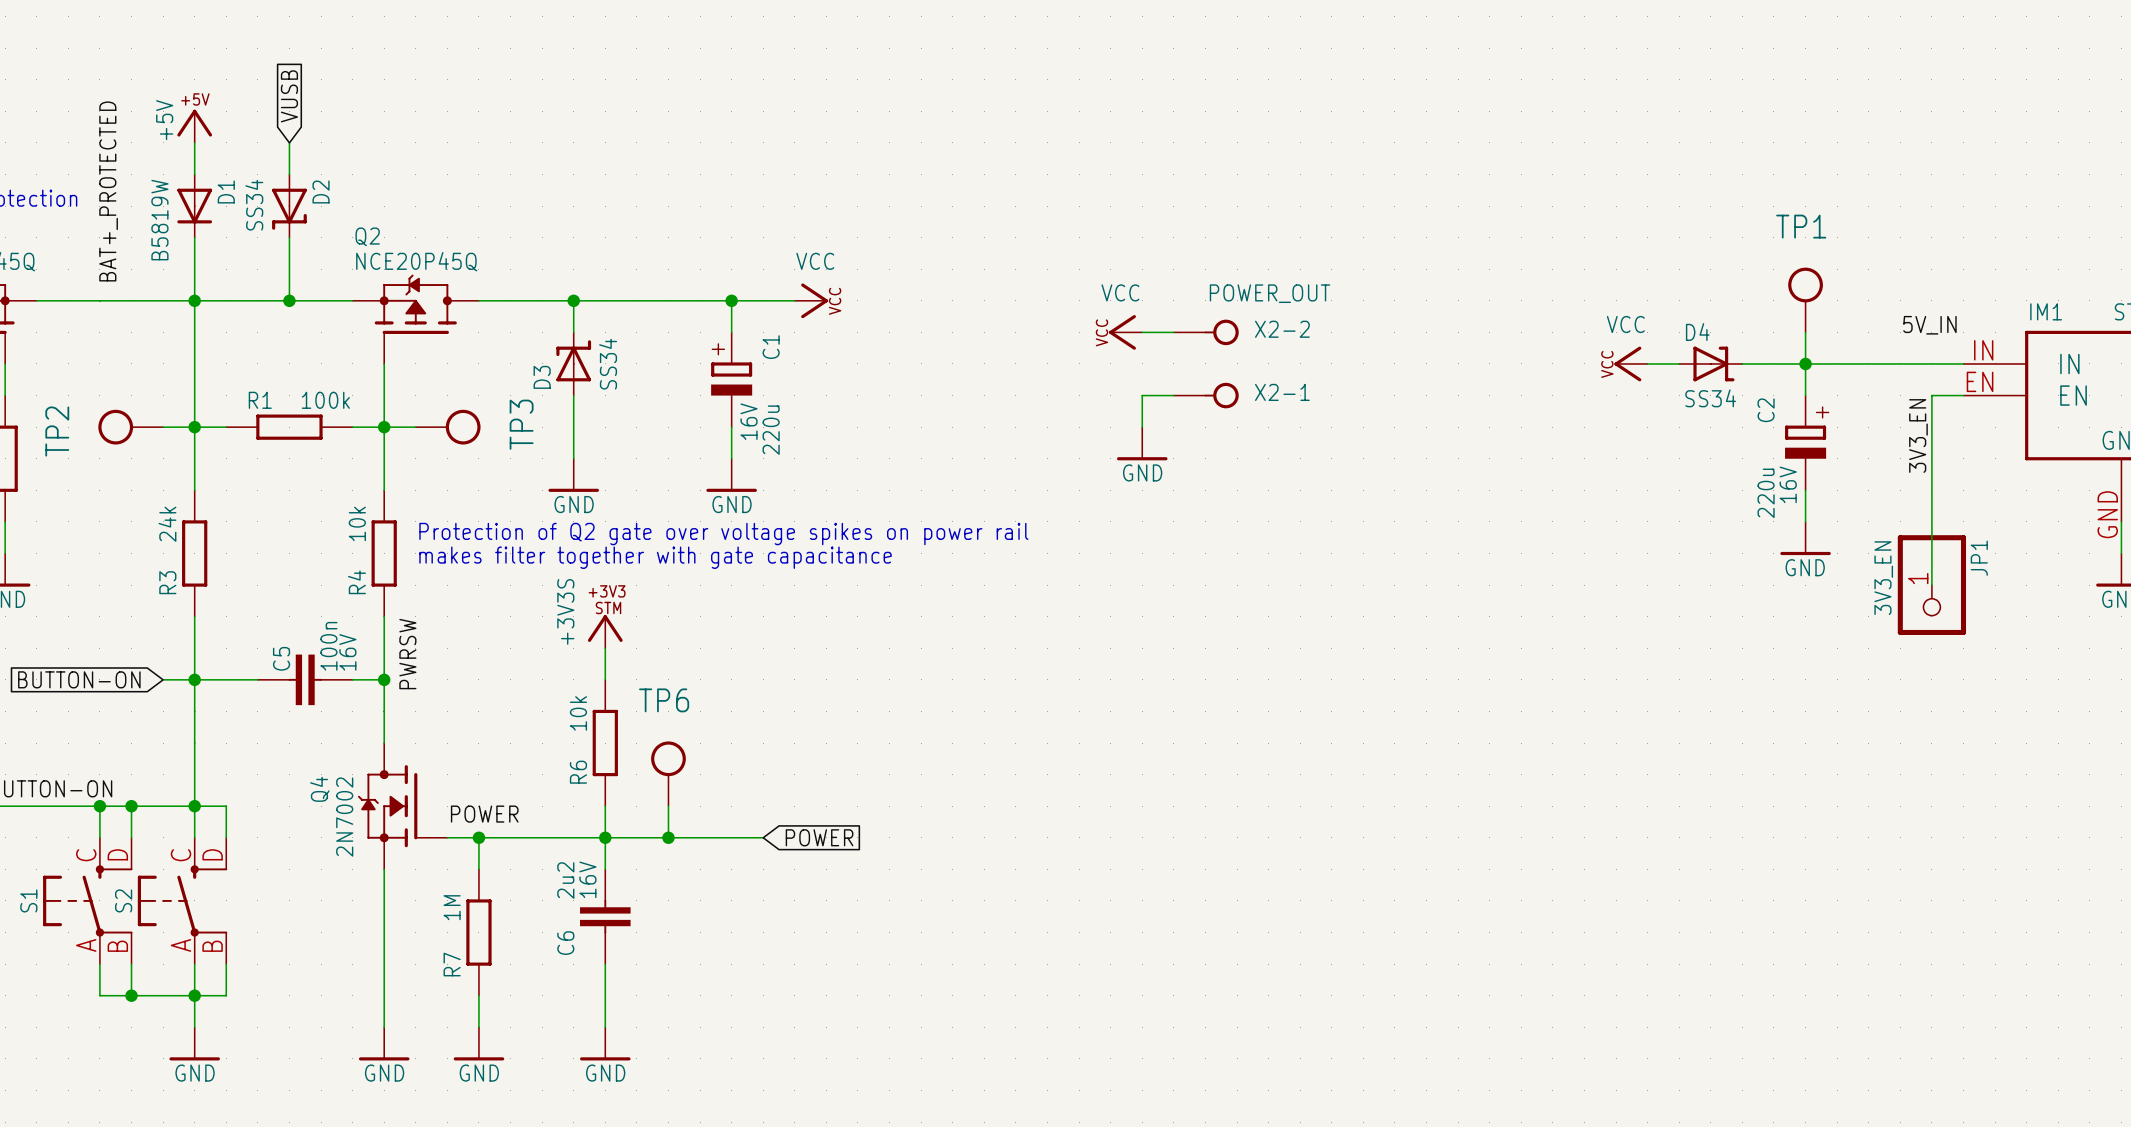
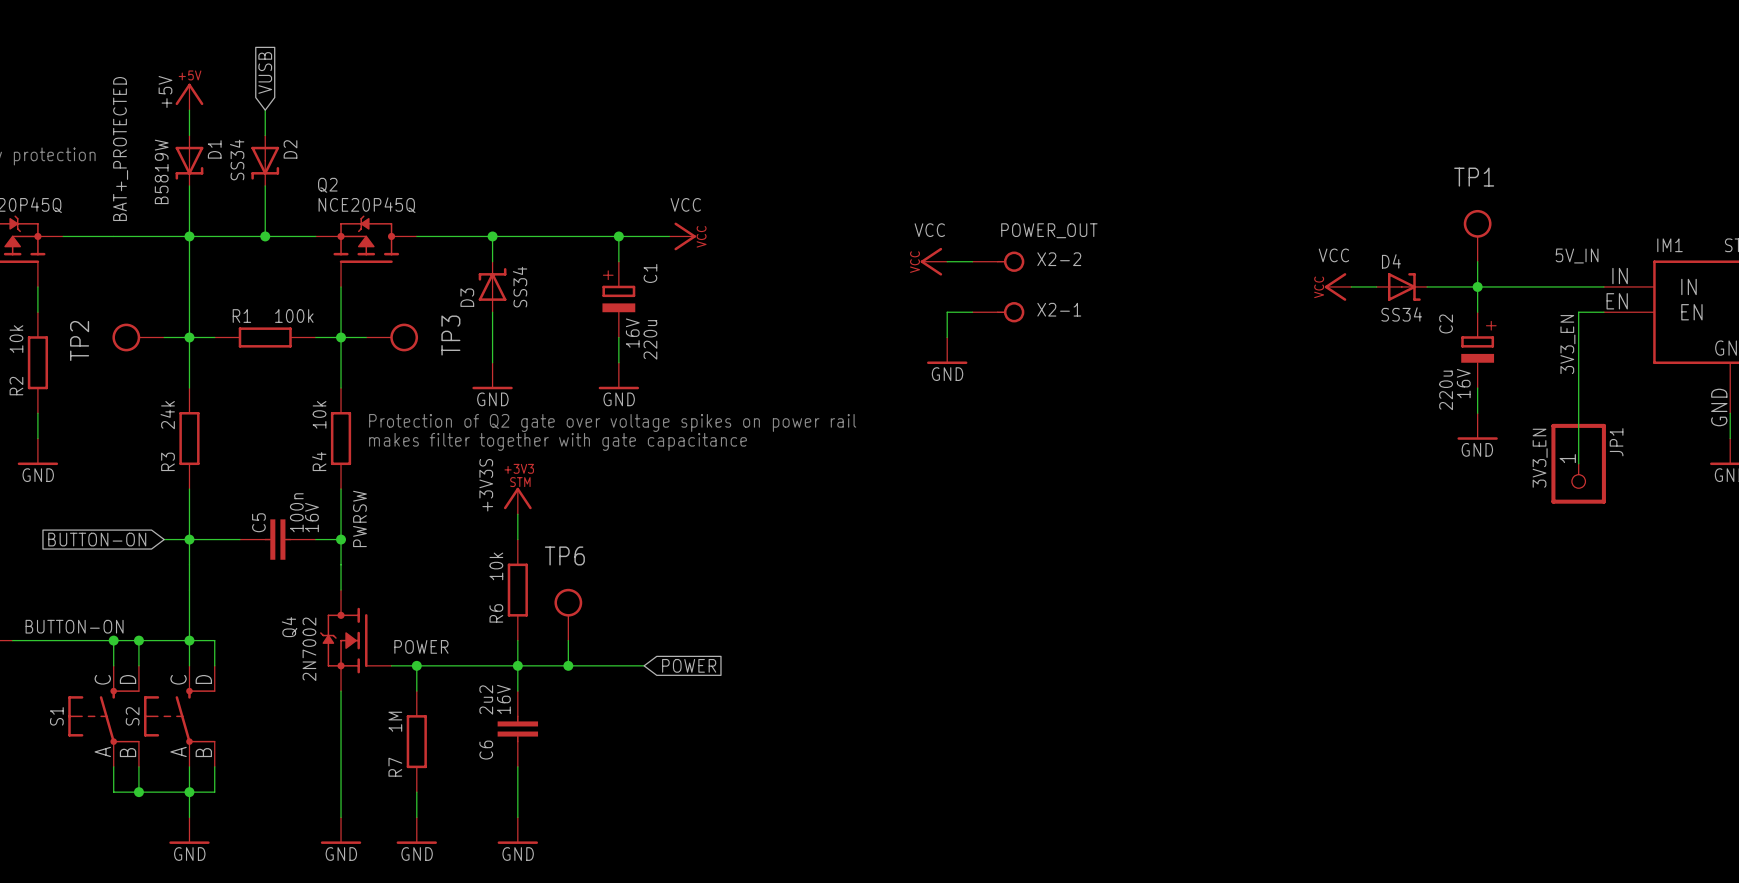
D1 symbol: [177, 174, 213, 238] -> [175, 135, 204, 186]

